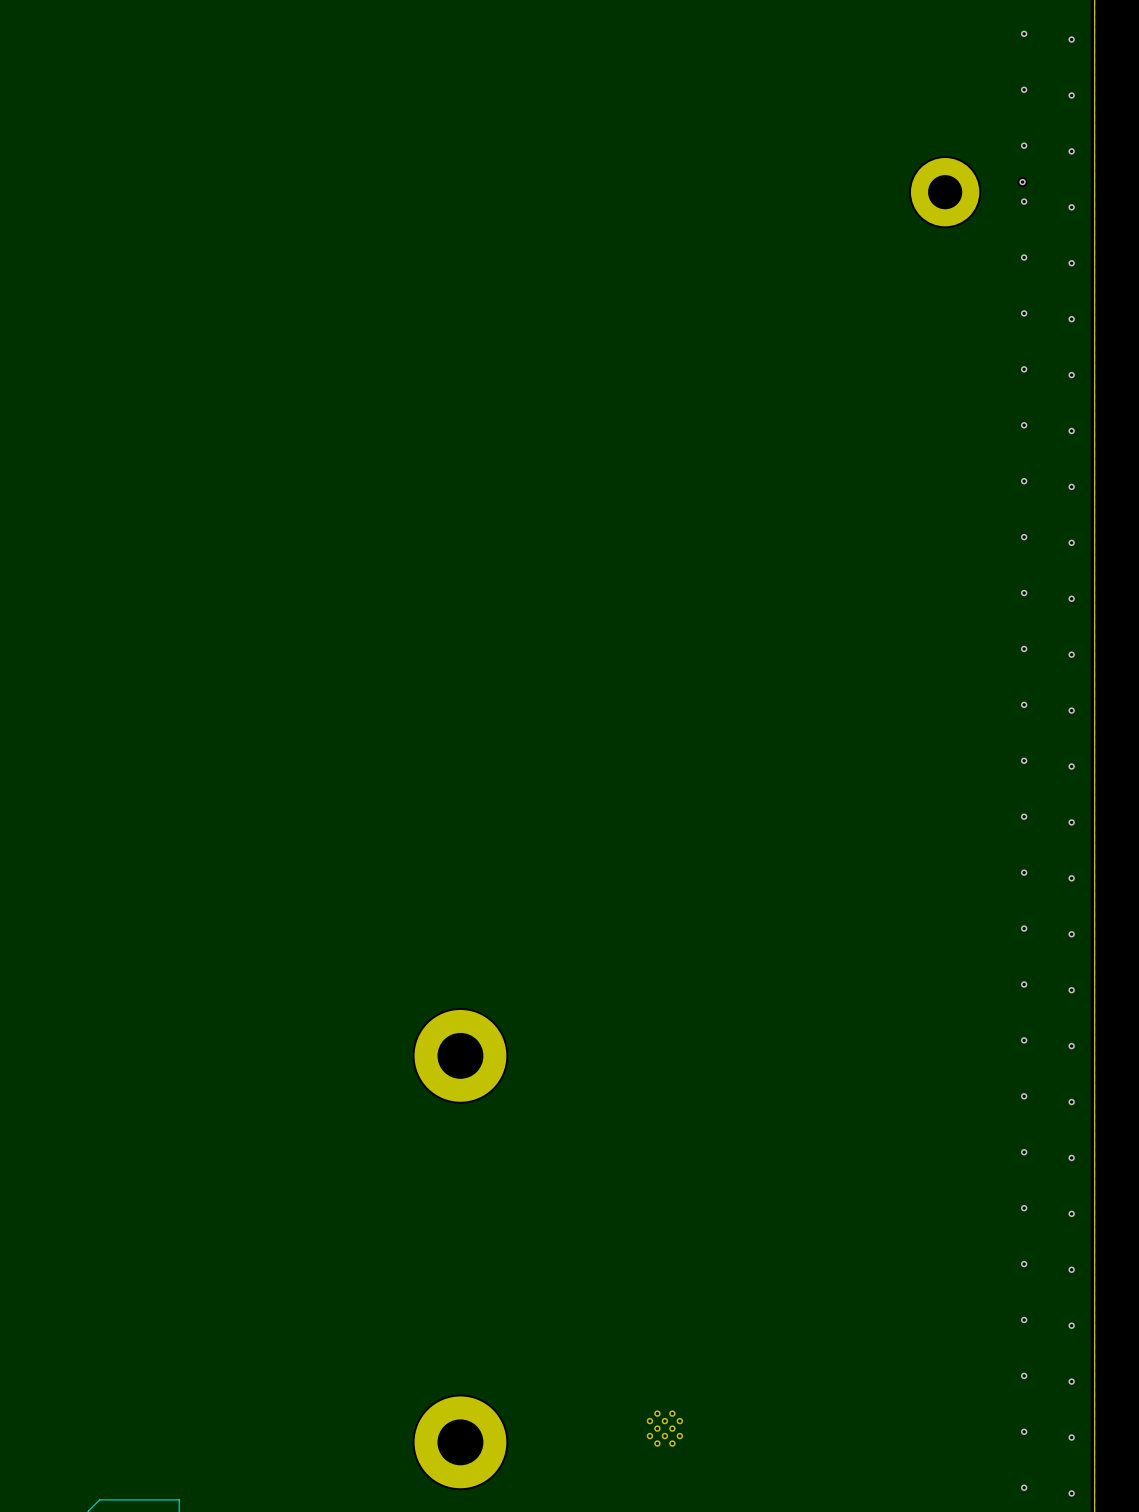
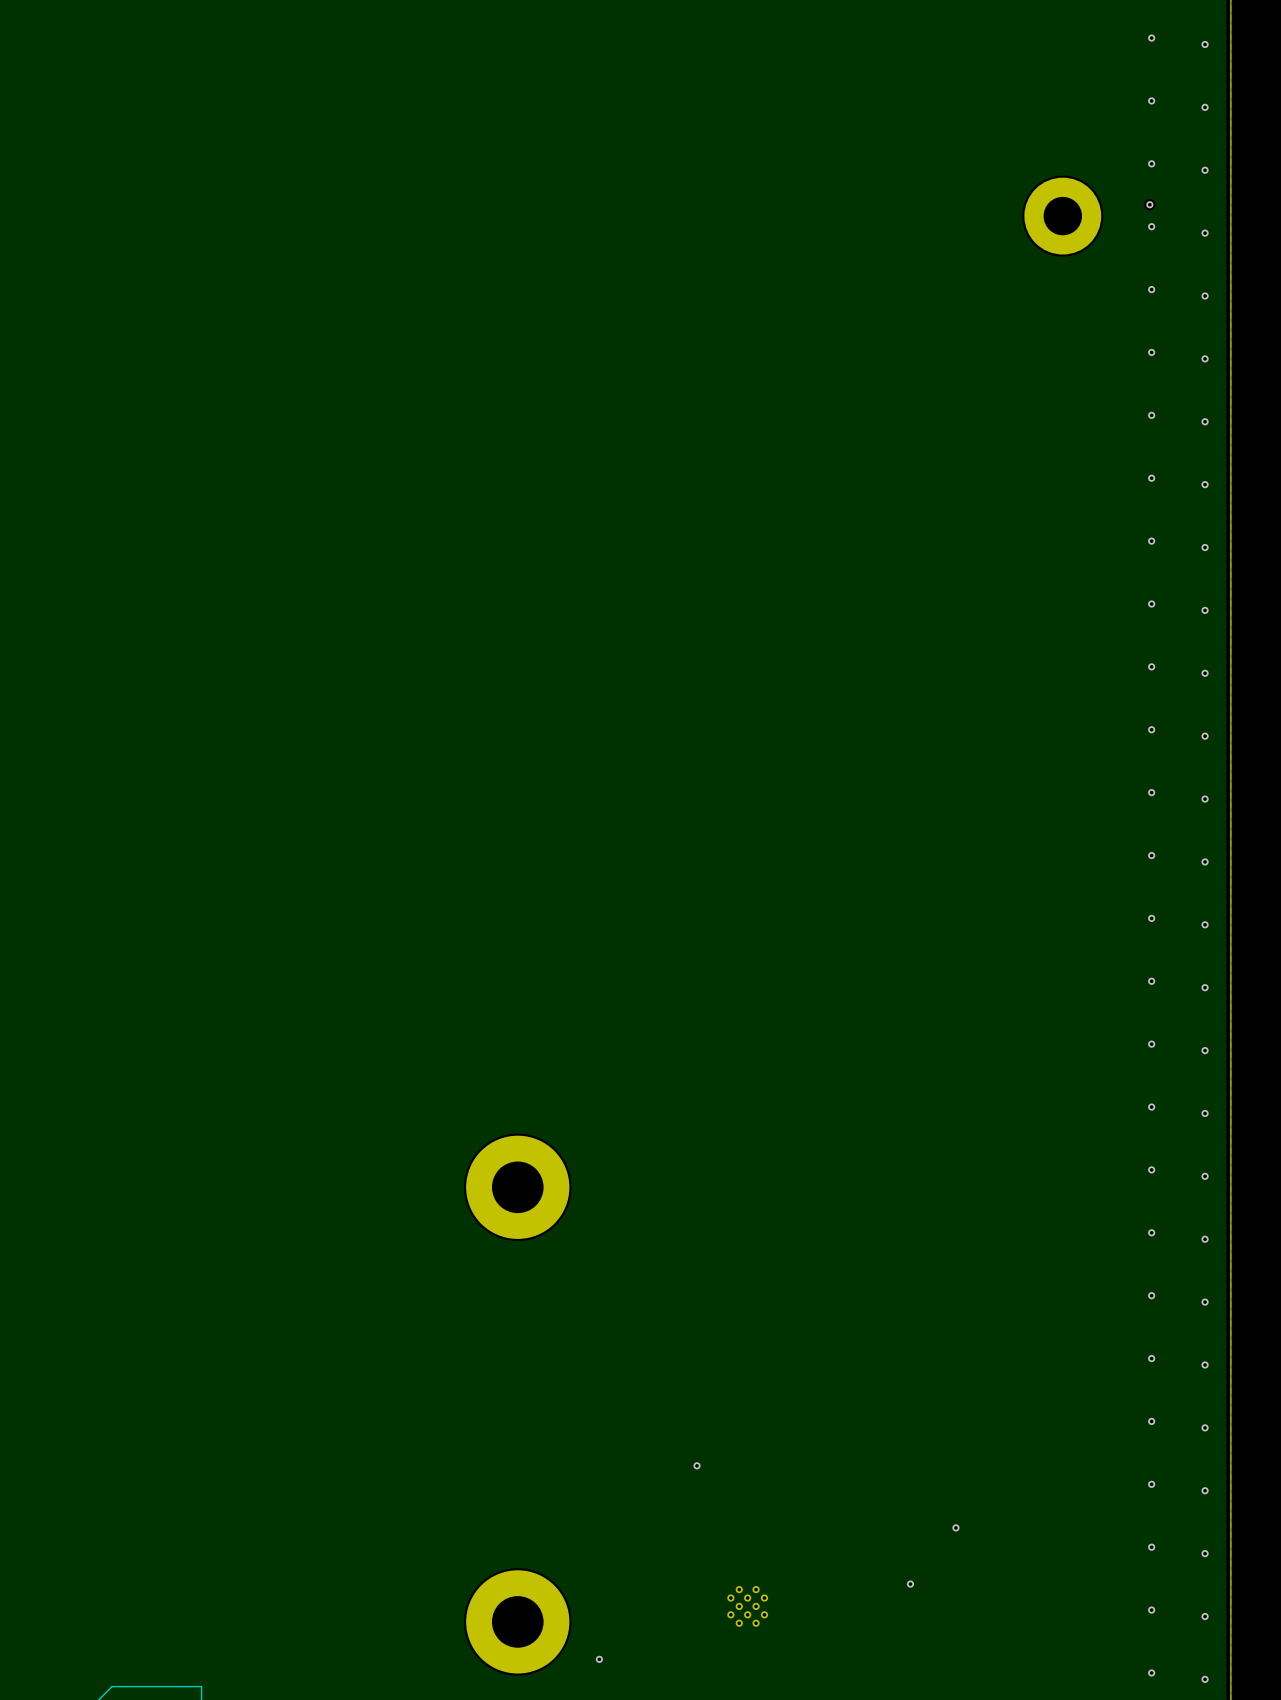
via: none -> (697, 1465)
via: none -> (955, 1527)
via: none -> (910, 1584)
via: none -> (599, 1659)

